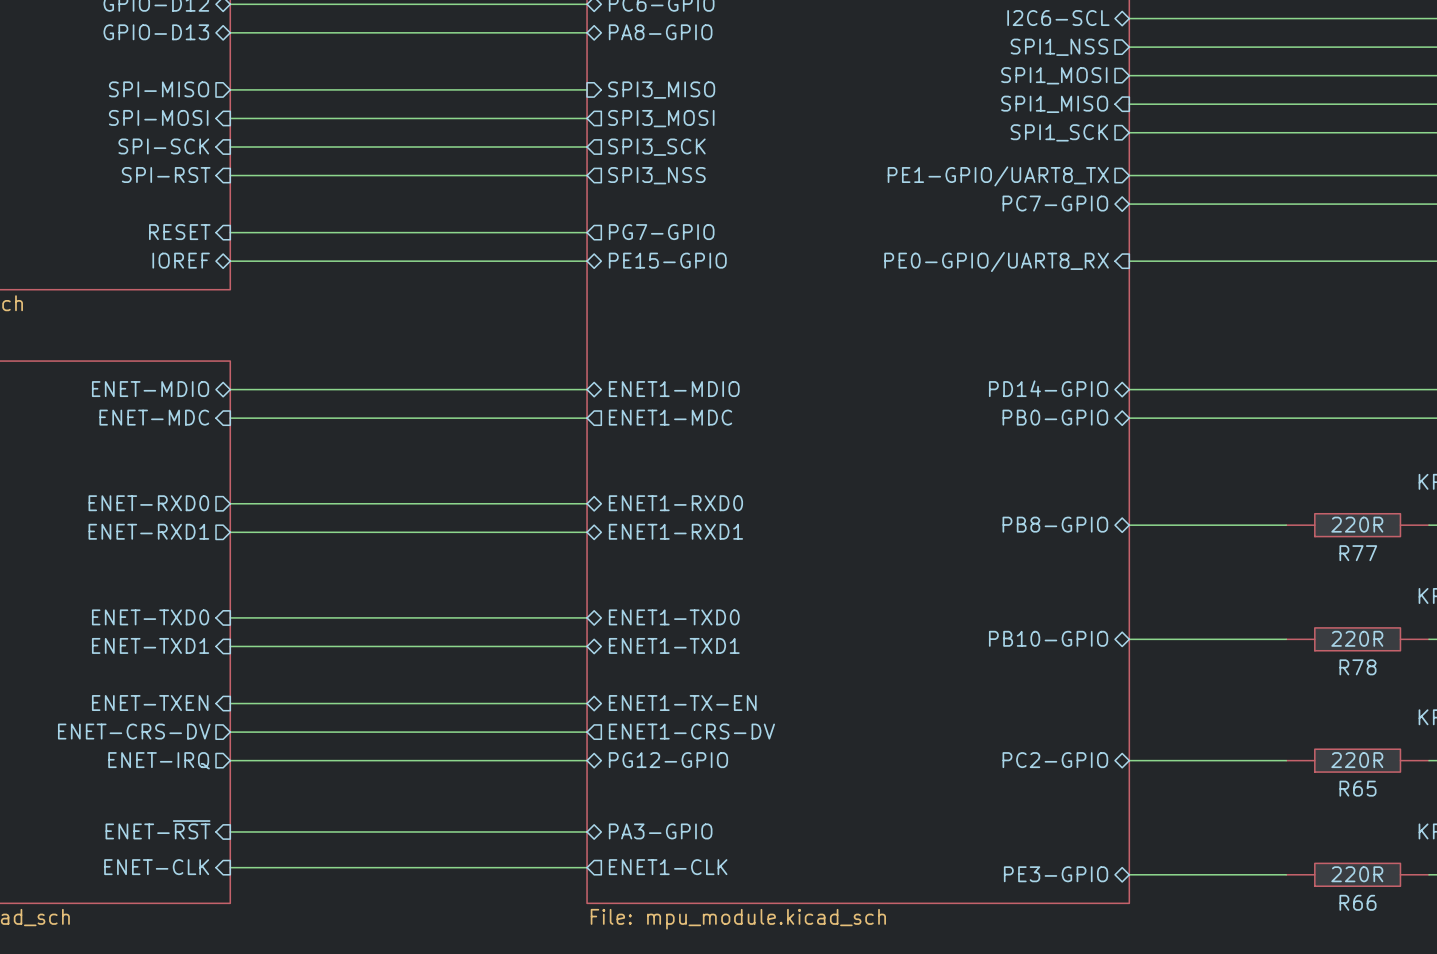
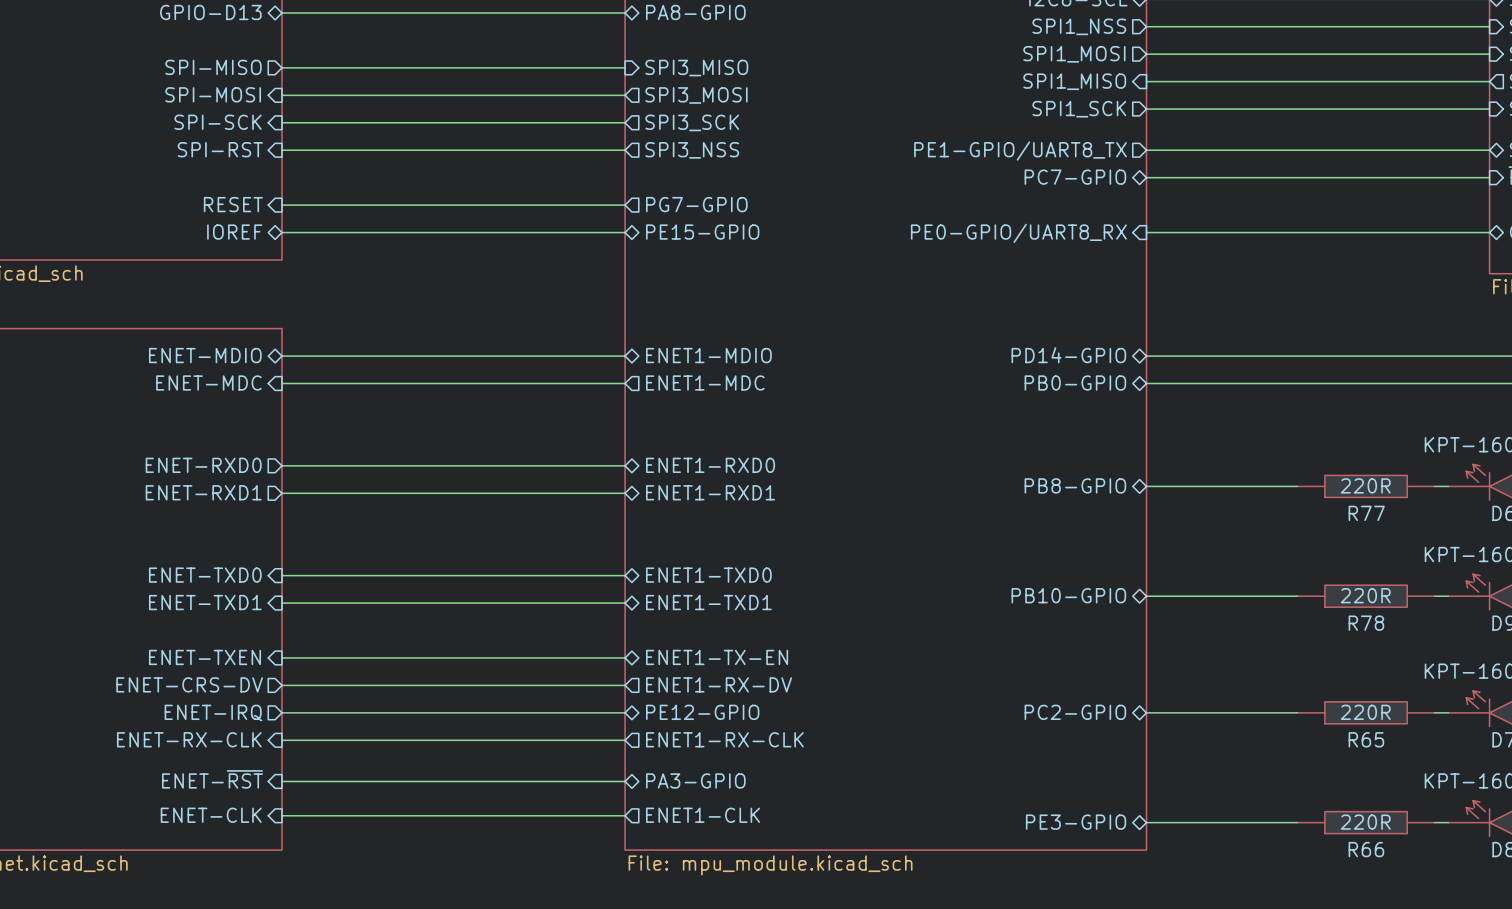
sheet pin: ENET1-CRS-DV (691, 731) -> ENET1-RX-DV (719, 684)
sheet pin: PG12-GPIO (668, 760) -> PE12-GPIO (702, 712)
sheet pin: none -> ENET-RX-CLK (189, 739)
sheet pin: none -> ENET1-RX-CLK (724, 739)
wire: none -> (281, 740) (625, 740)

